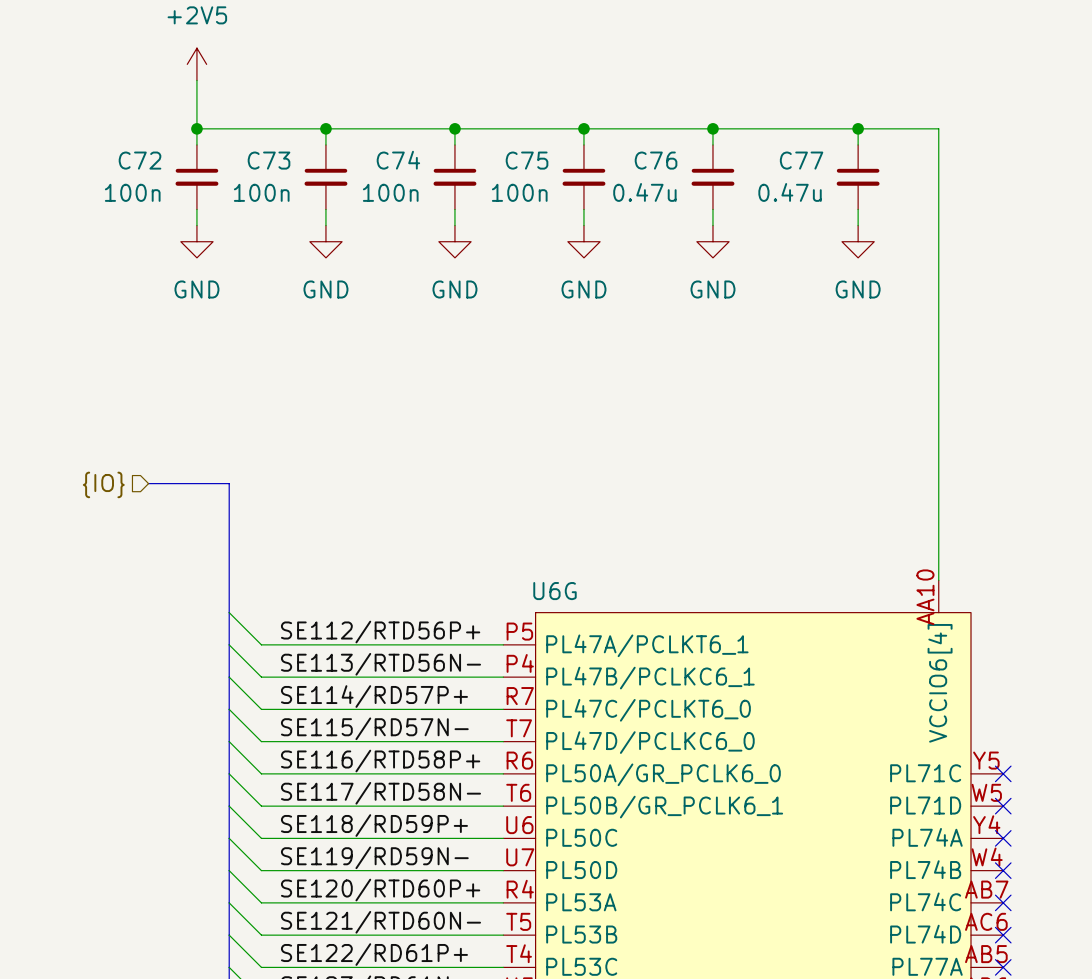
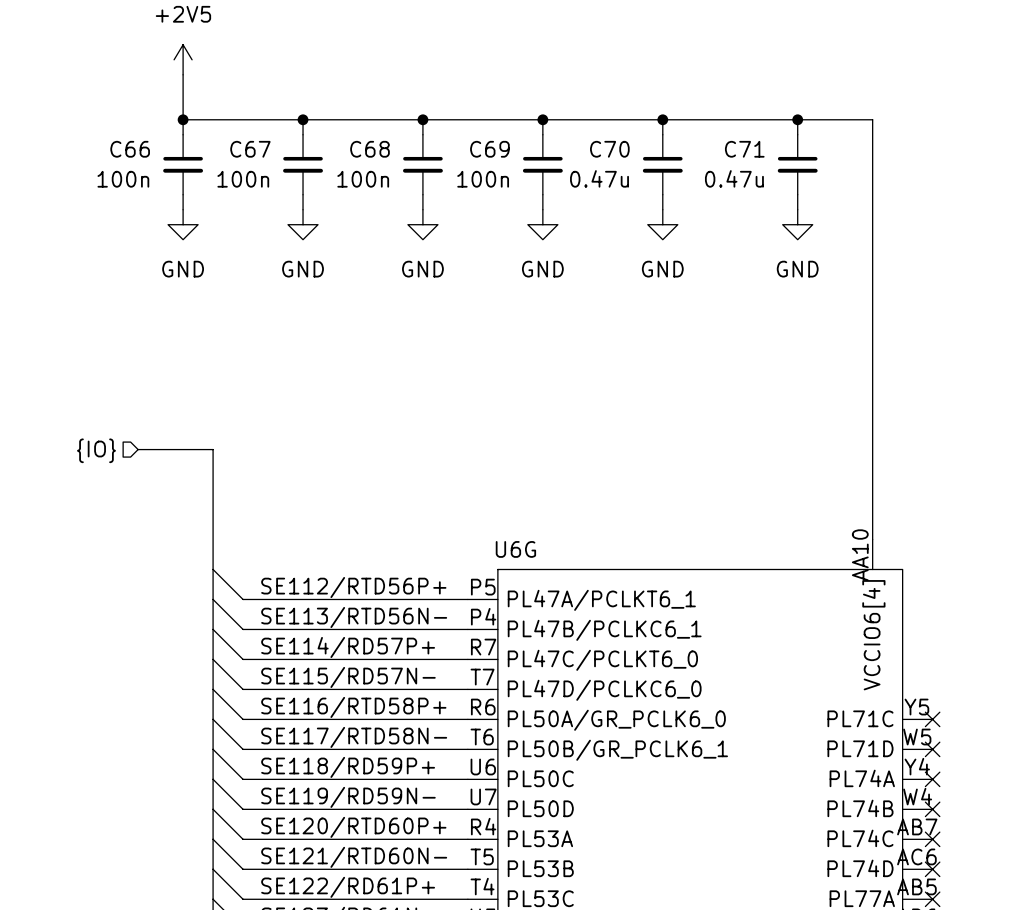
C72 name: C72 (140, 160) -> C66 (130, 149)
C73 name: C73 (269, 160) -> C67 (250, 149)
C74 name: C74 (398, 160) -> C68 (370, 149)
C75 name: C75 (527, 160) -> C69 (489, 149)
C76 name: C76 (656, 160) -> C70 (609, 149)
C77 name: C77 (801, 160) -> C71 (744, 149)

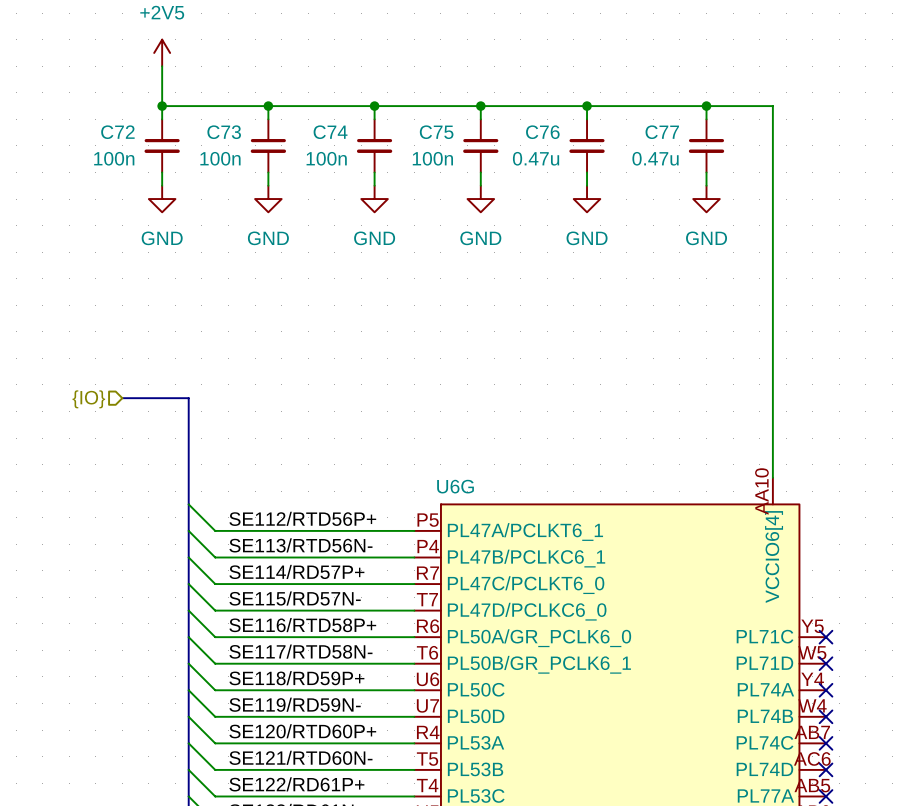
C66 name: C66 (130, 149) -> C72 (117, 132)
C67 name: C67 (250, 149) -> C73 (224, 132)
C68 name: C68 (370, 149) -> C74 (330, 132)
C69 name: C69 (489, 149) -> C75 (436, 132)
C70 name: C70 (609, 149) -> C76 (542, 132)
C71 name: C71 (744, 149) -> C77 (662, 132)

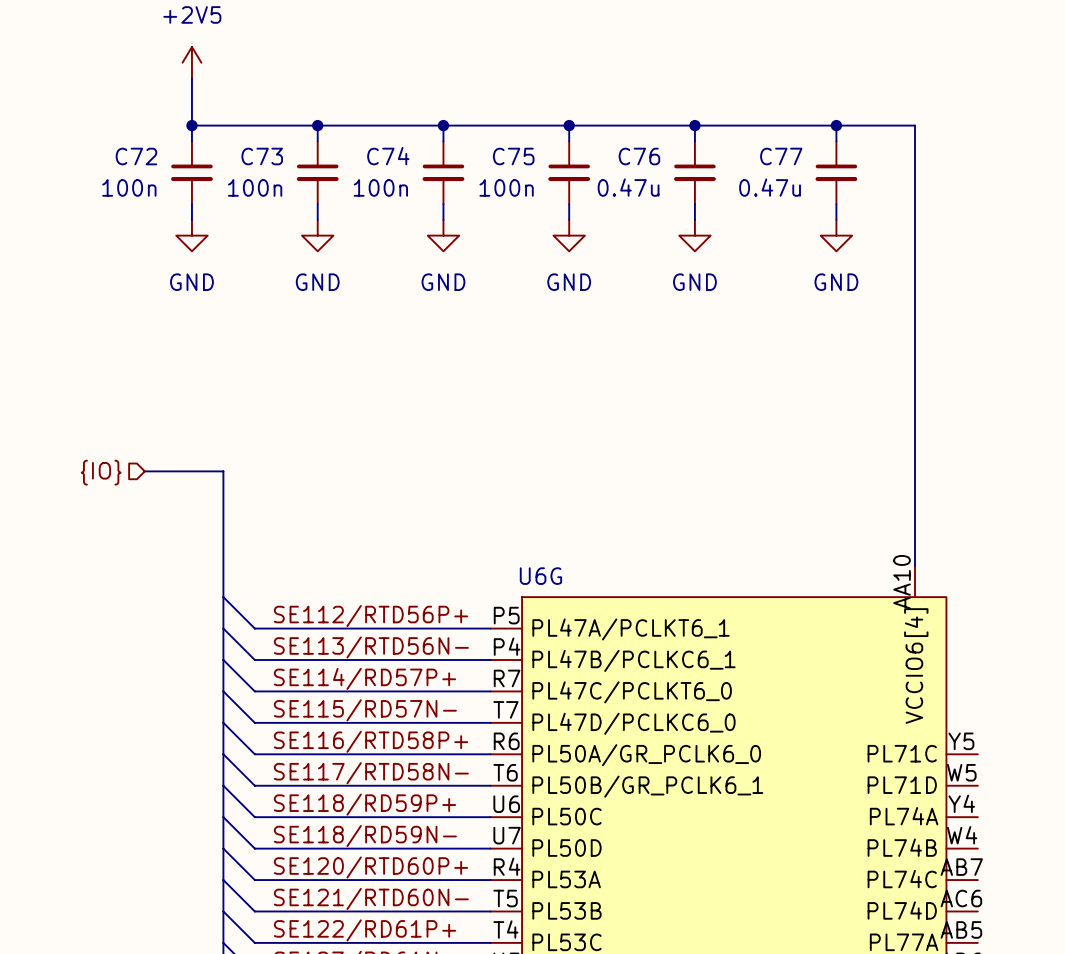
no-connect mark: (826, 637) -> none
no-connect mark: (826, 663) -> none
no-connect mark: (826, 690) -> none
label: SE119/RD59N- (295, 704) -> SE118/RD59N- (365, 836)
no-connect mark: (826, 716) -> none
no-connect mark: (826, 743) -> none
no-connect mark: (826, 769) -> none
no-connect mark: (826, 796) -> none

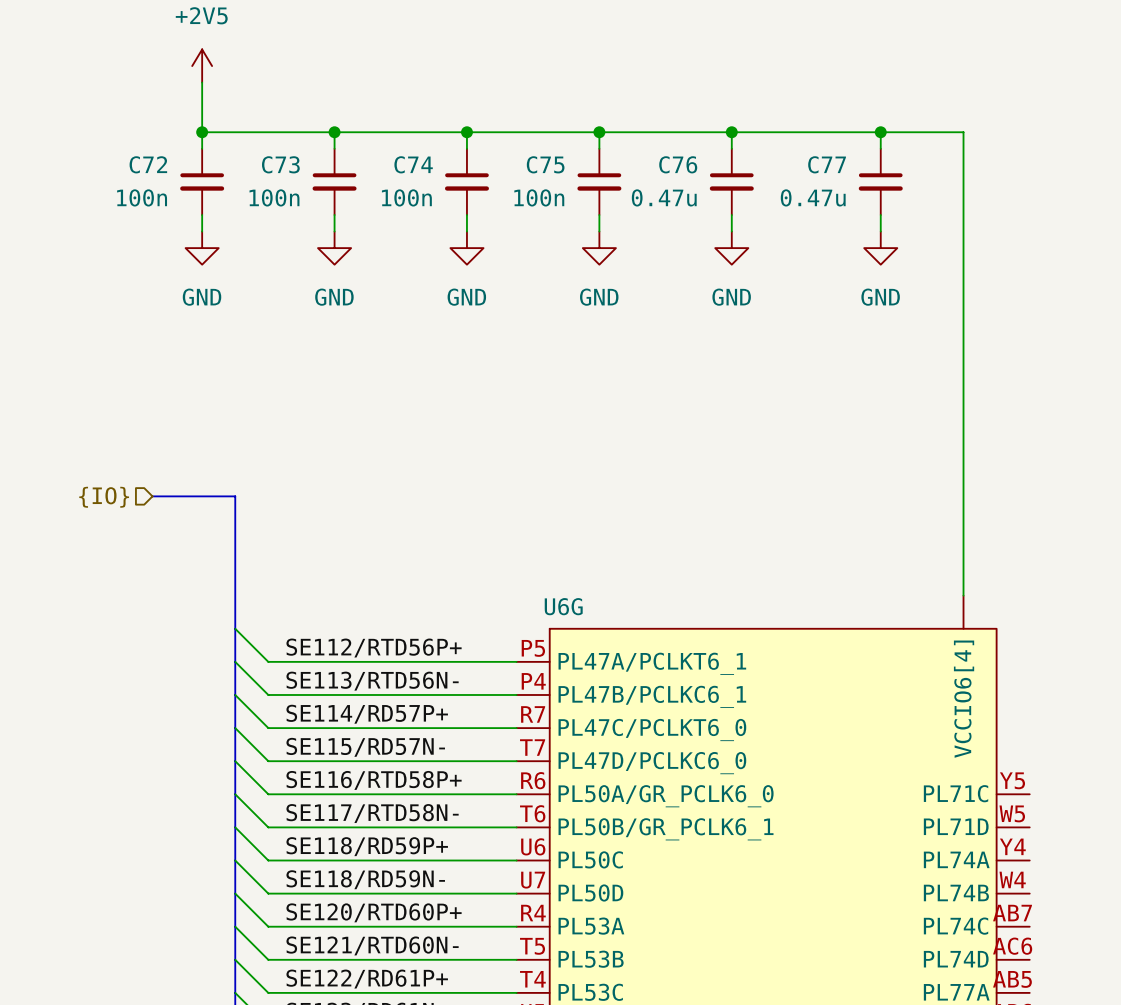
U6G pin number: AA10 (902, 582) -> none

